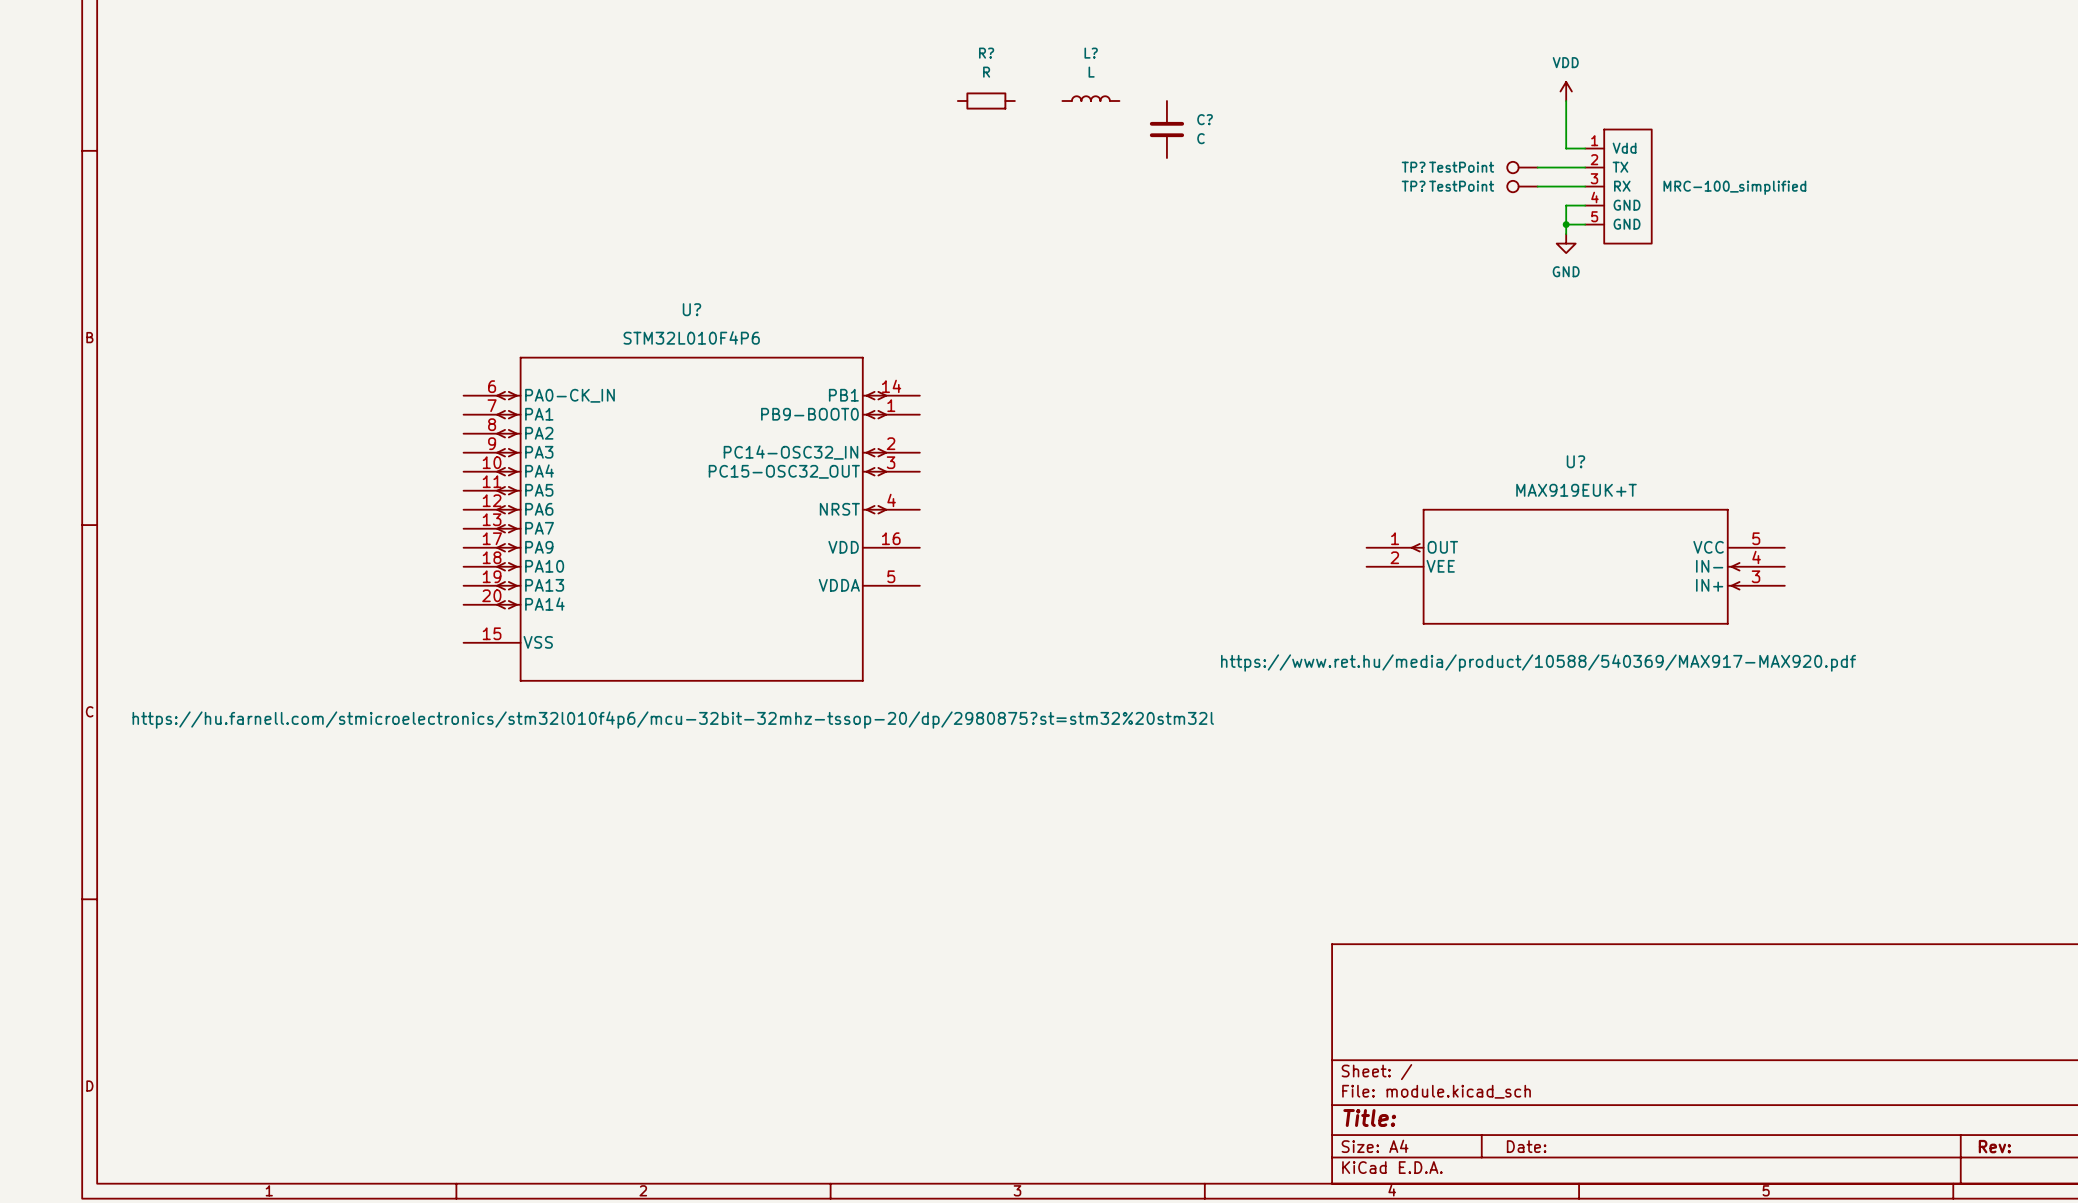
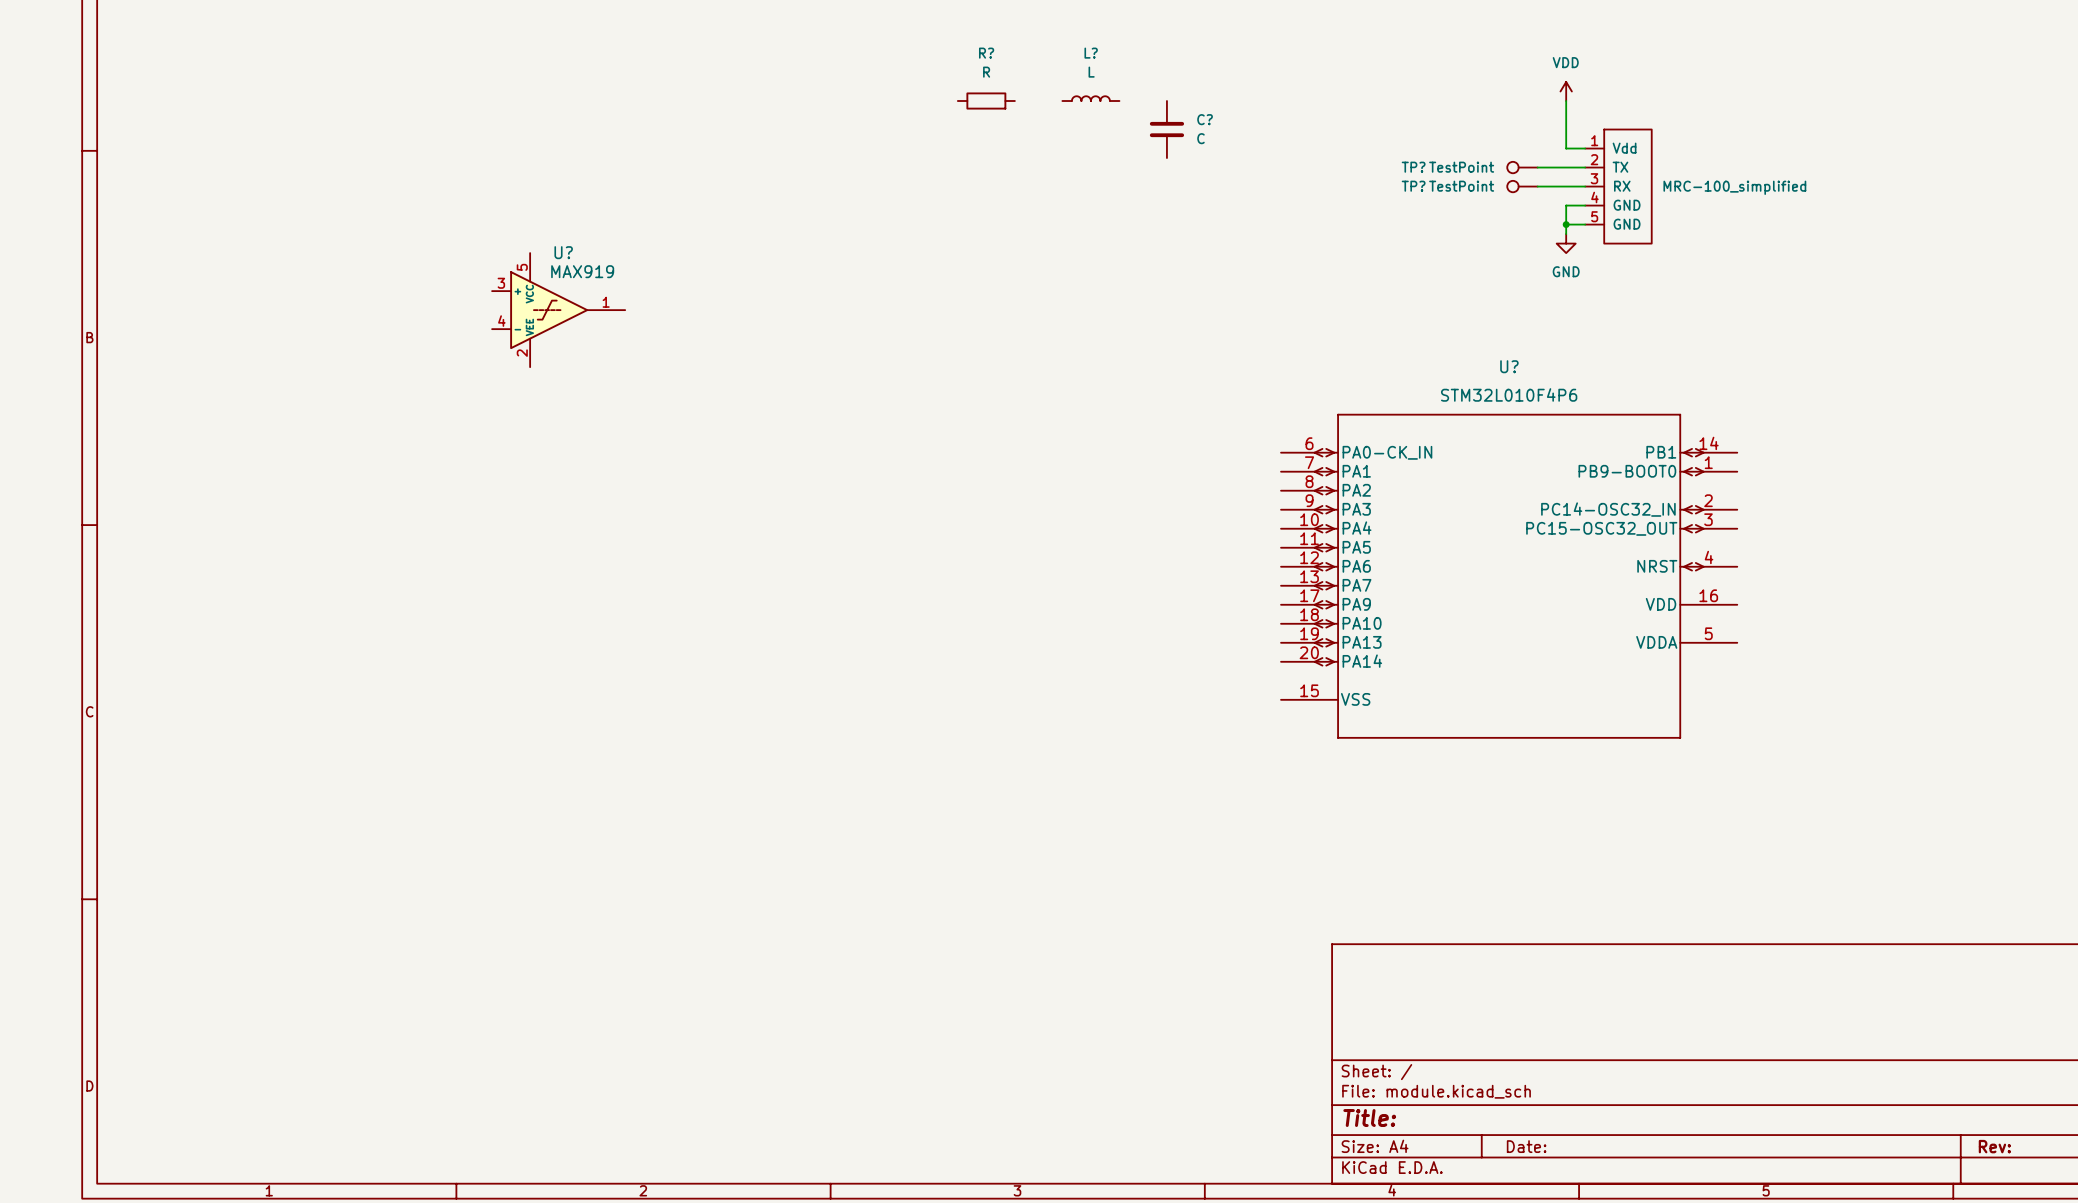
U?: none -> MAX919 (558, 310)
U?: STM32L010F4P6 (691, 519) -> none
U?: MAX919EUK+T (1575, 566) -> none
U?: none -> STM32L010F4P6 (1509, 576)

